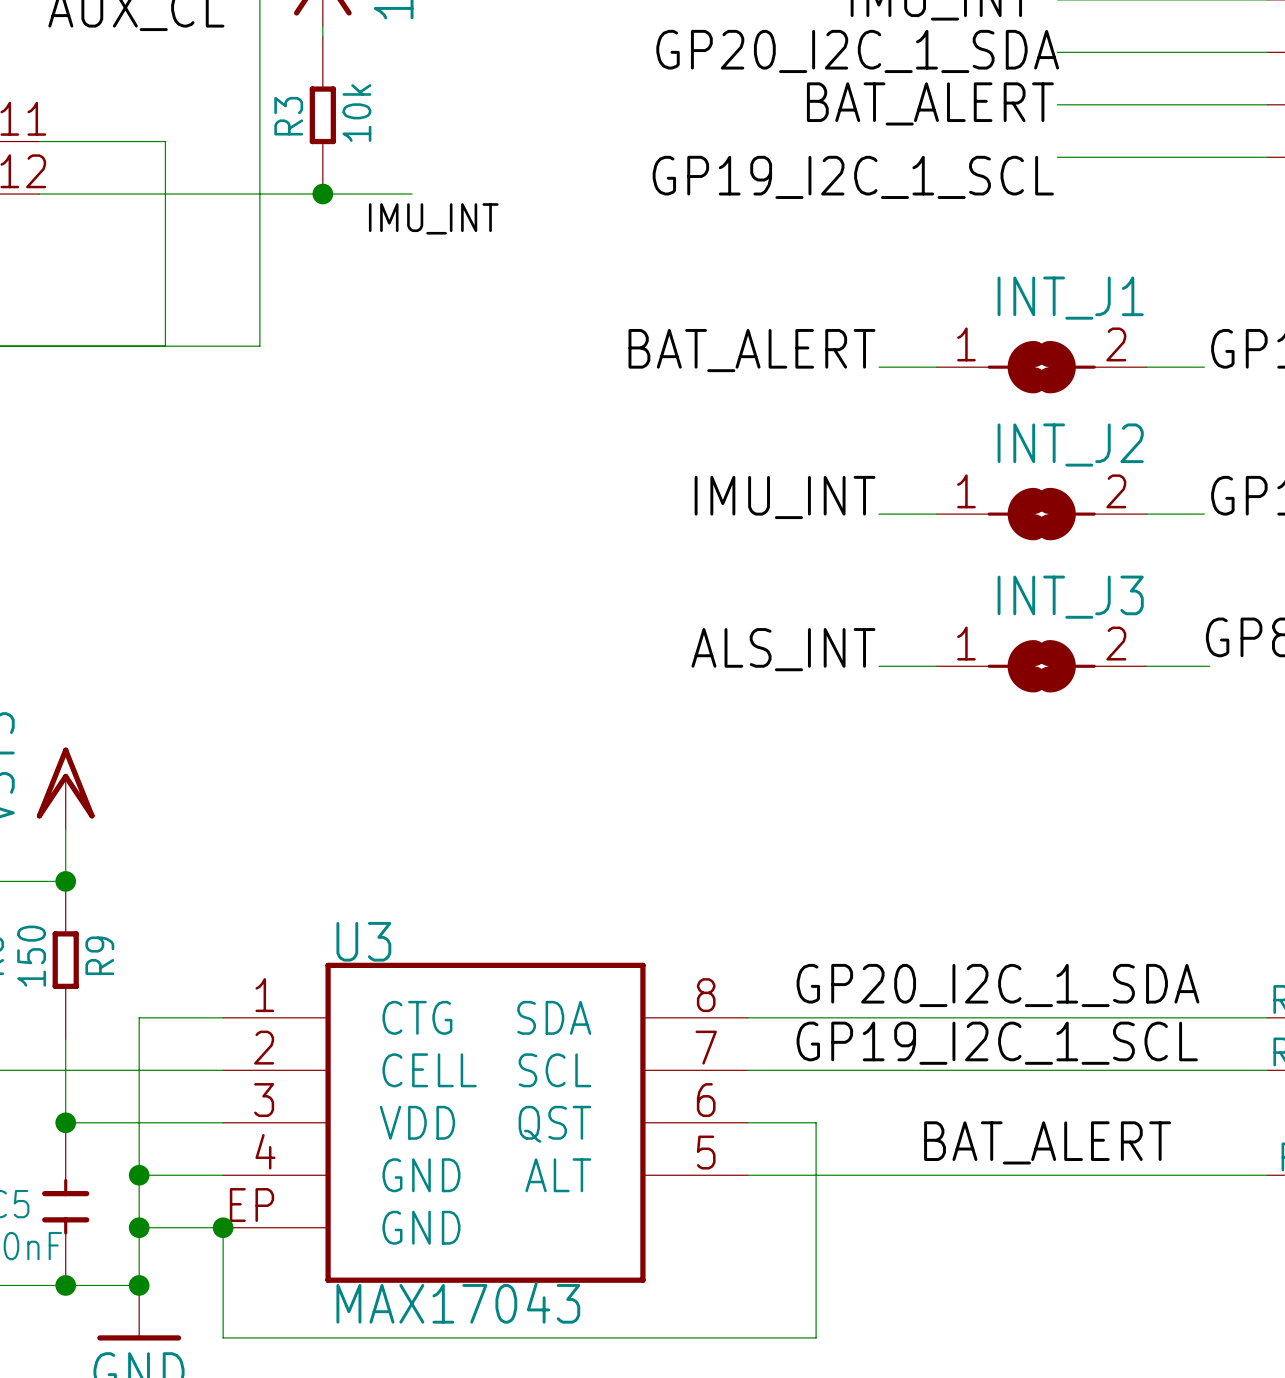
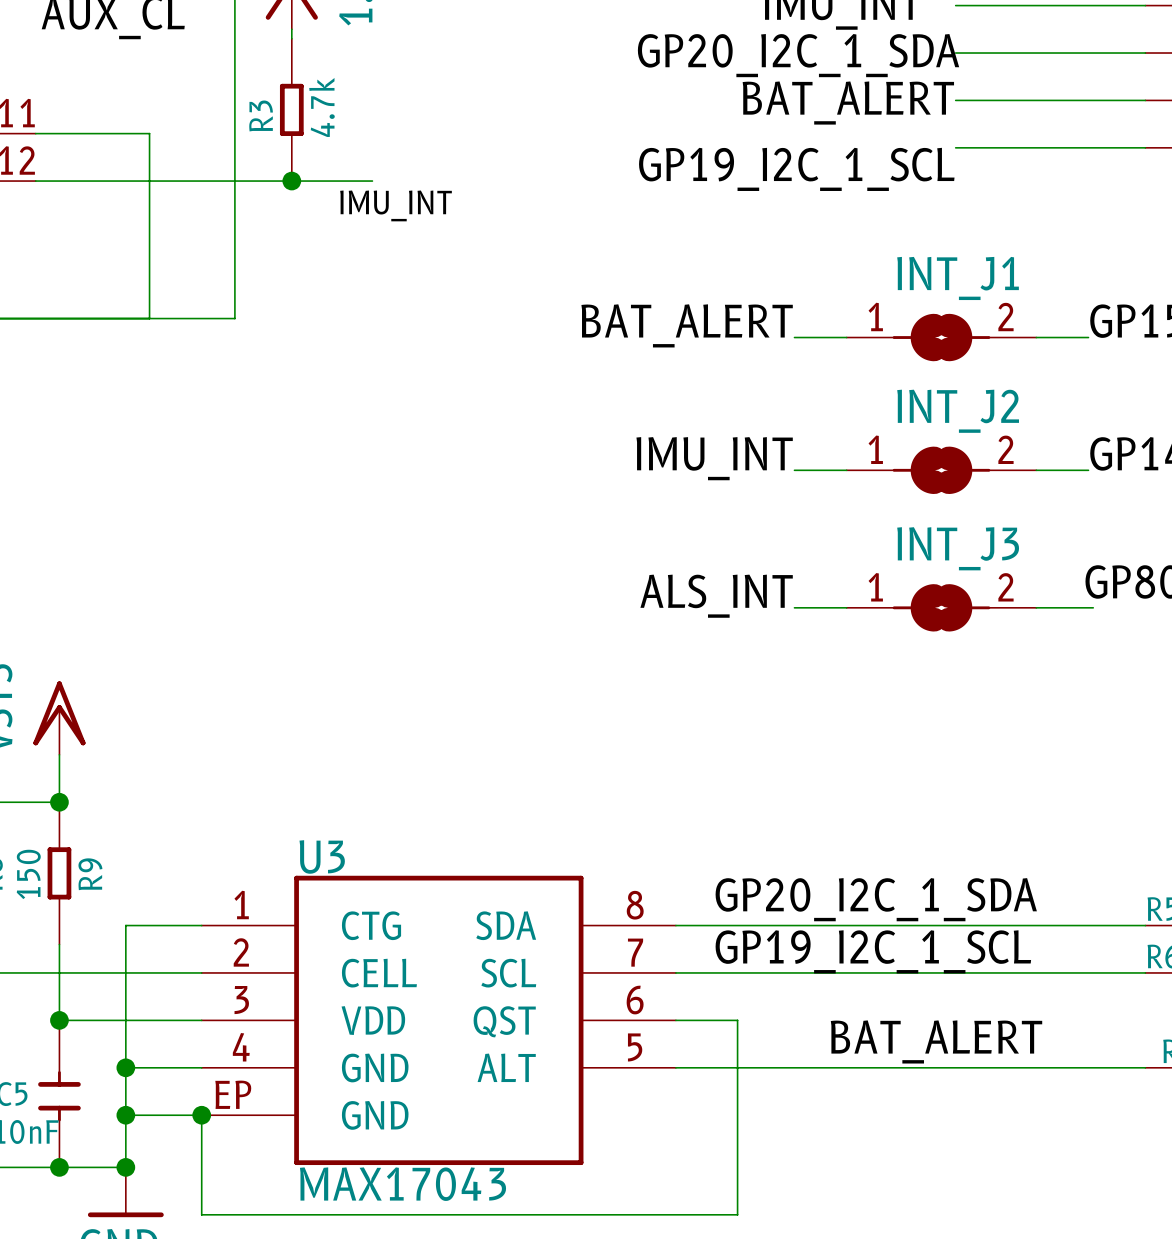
R3 value: 10k (356, 113) -> 4.7k (321, 107)

